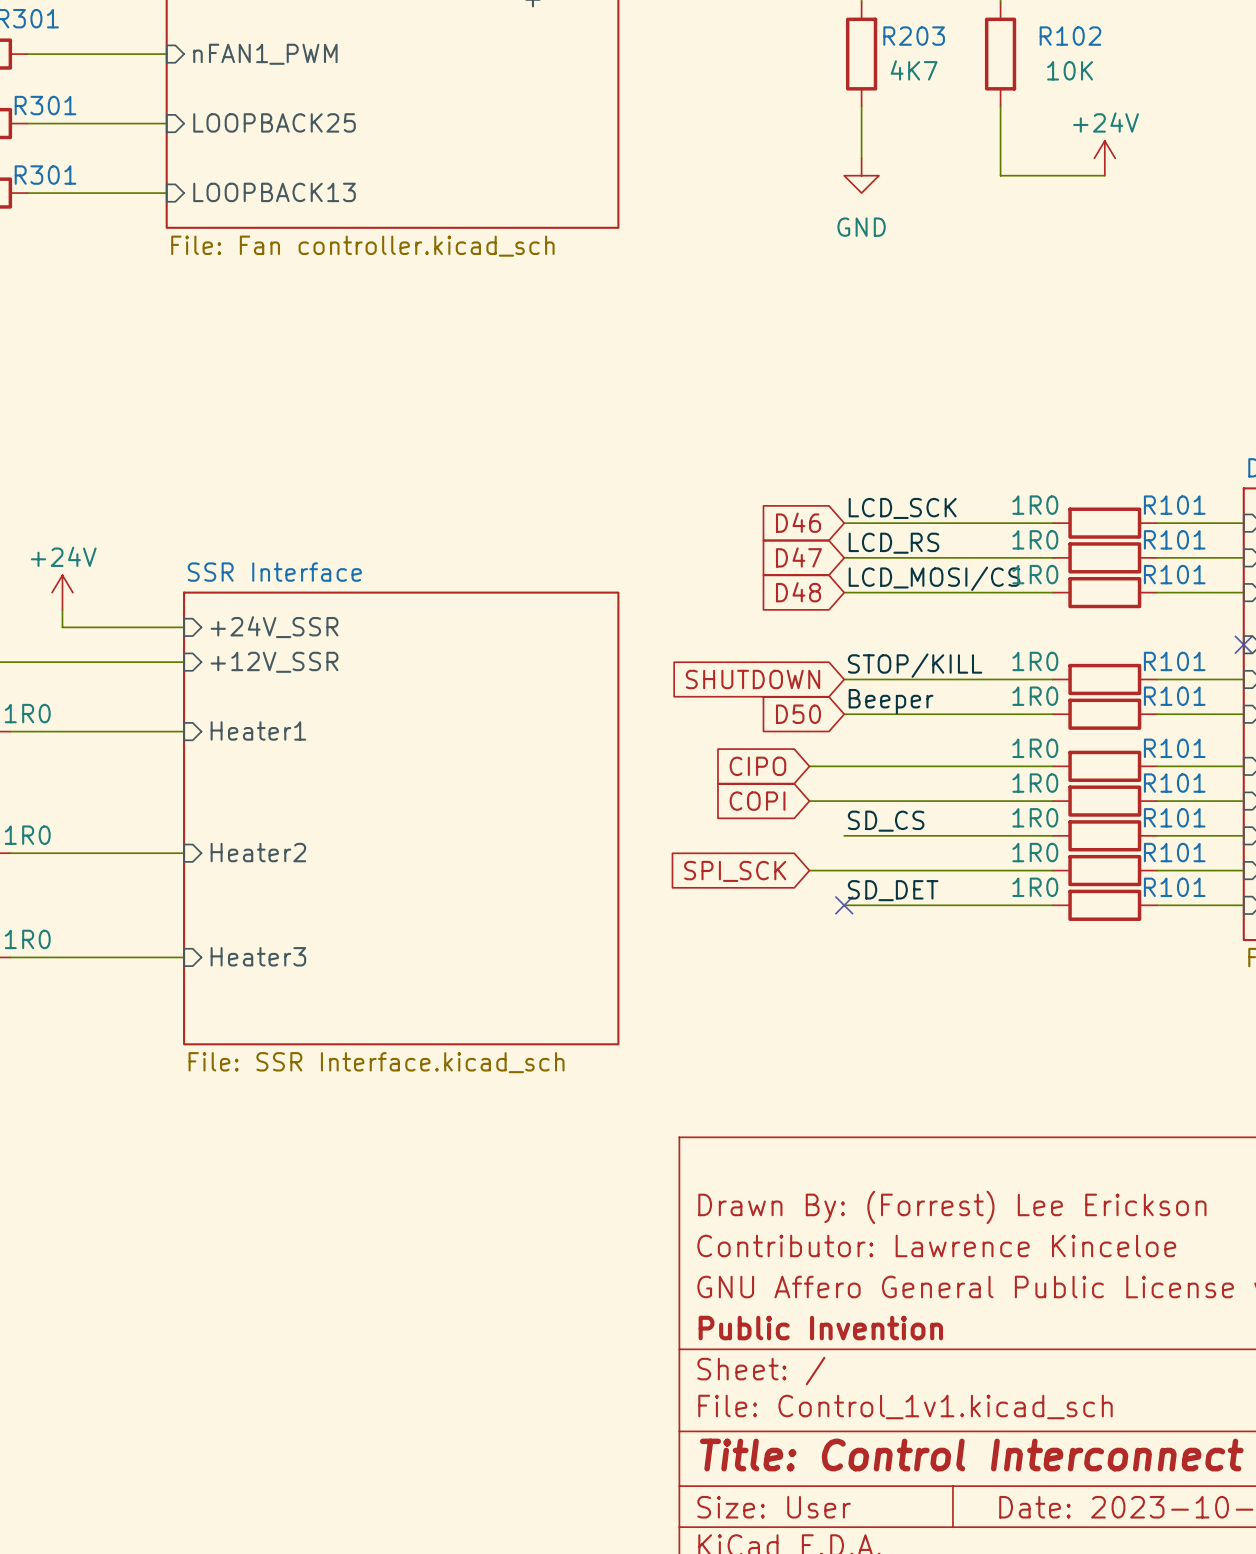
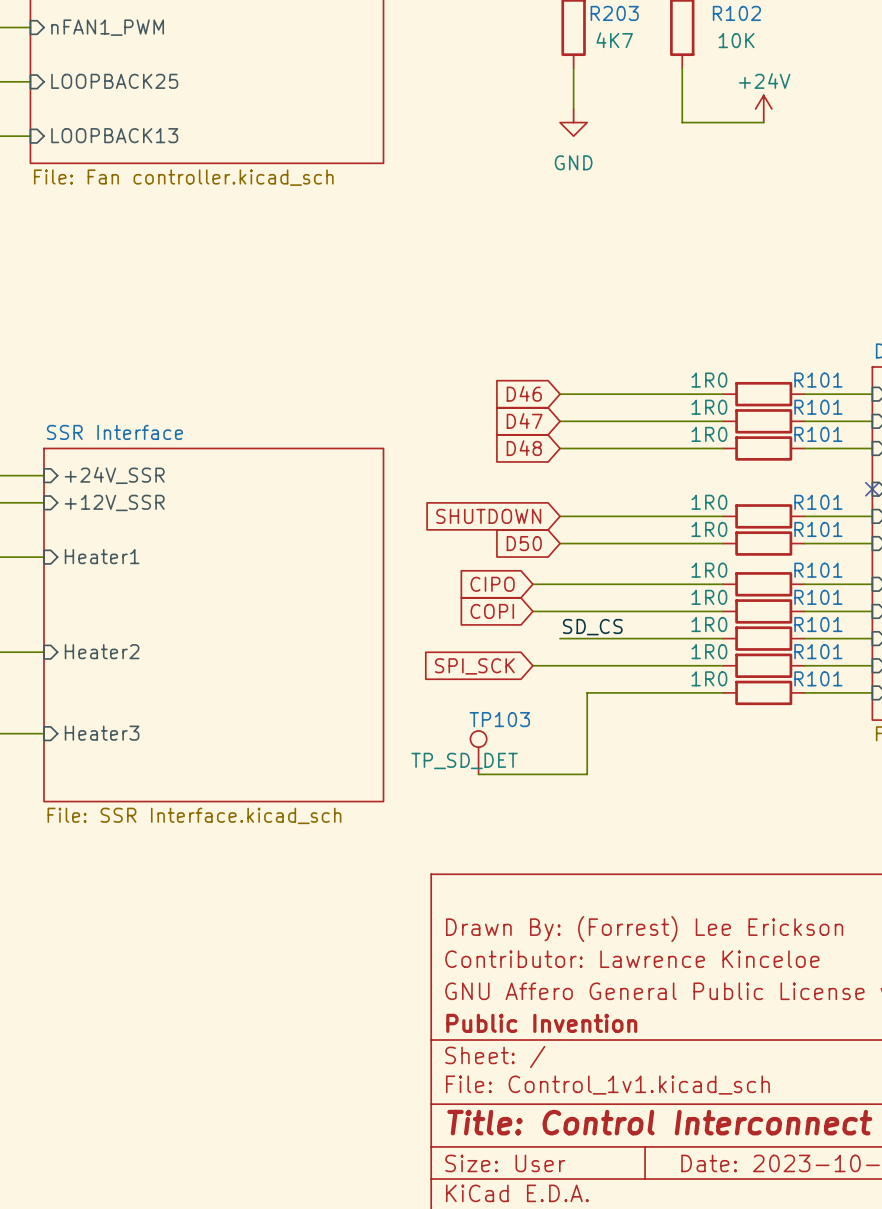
label: LCD_SCK (902, 508) -> none
label: LCD_RS (893, 543) -> none
label: LCD_MOSI/CS (934, 578) -> none
label: STOP/KILL (915, 665) -> none
label: Beeper (891, 701) -> none
label: SD_DET (893, 890) -> none
wire: (844, 905) (878, 905) -> (478, 774) (587, 774) (587, 692)
no-connect mark: (844, 905) -> none
TP103: none -> TP_SD_DET (478, 752)

